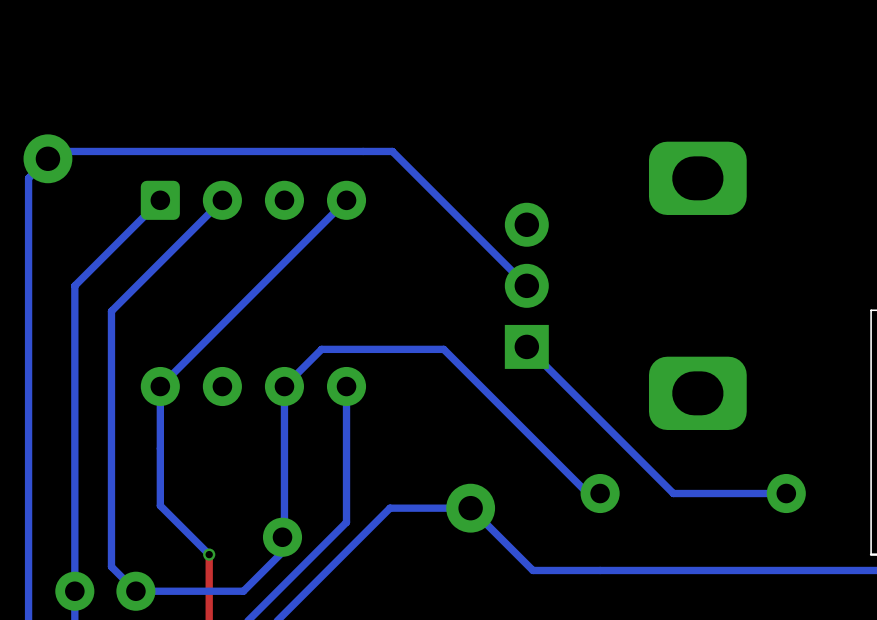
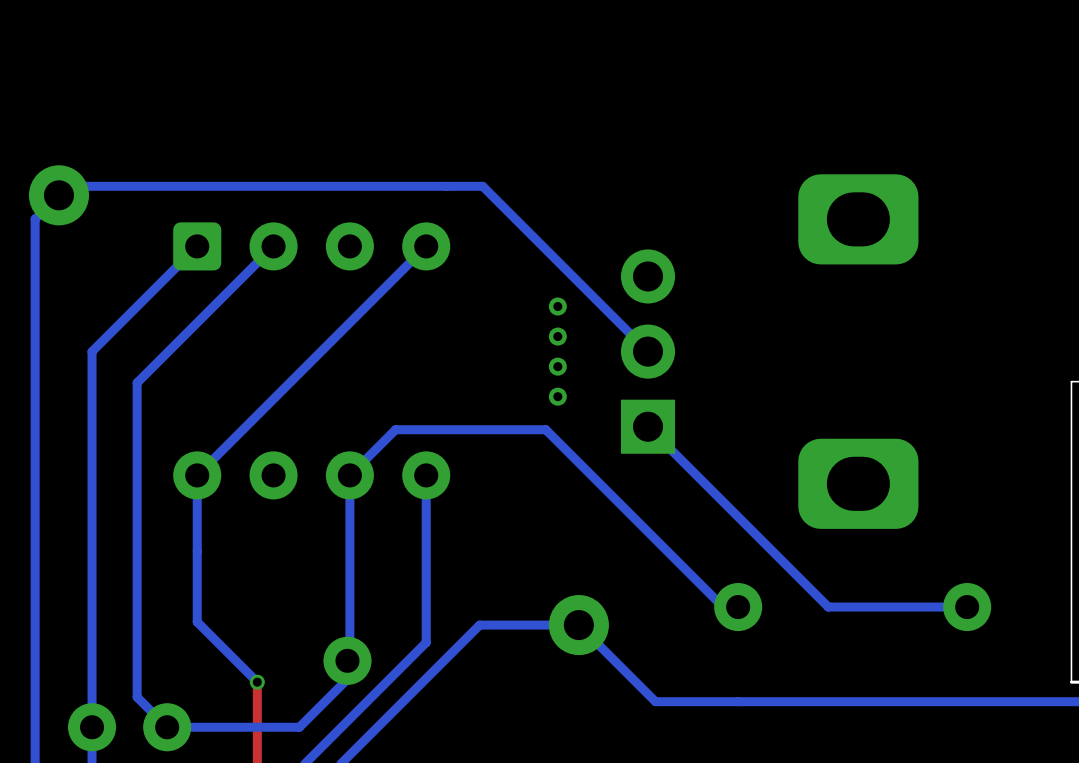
via: none -> (557, 306)
via: none -> (557, 336)
via: none -> (557, 366)
via: none -> (557, 396)

